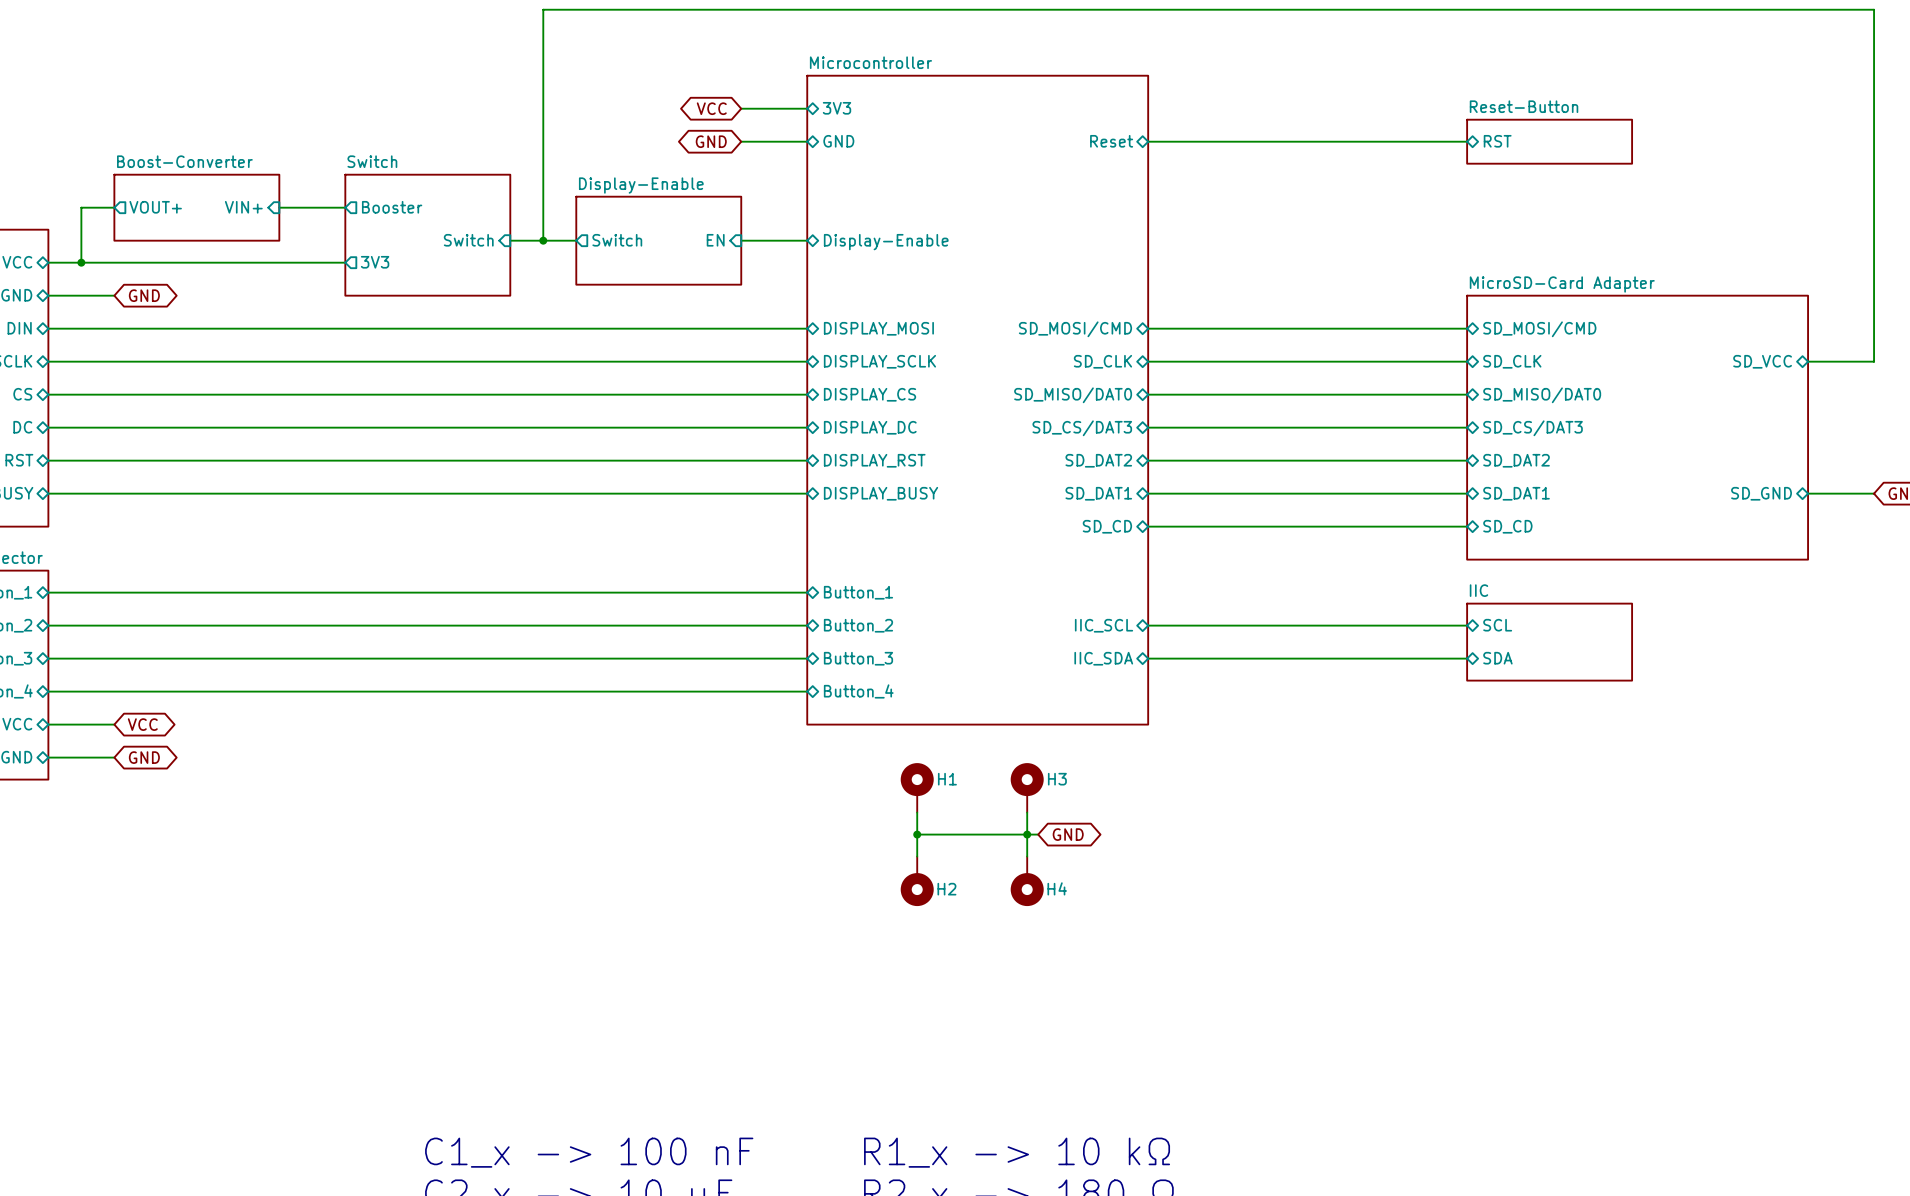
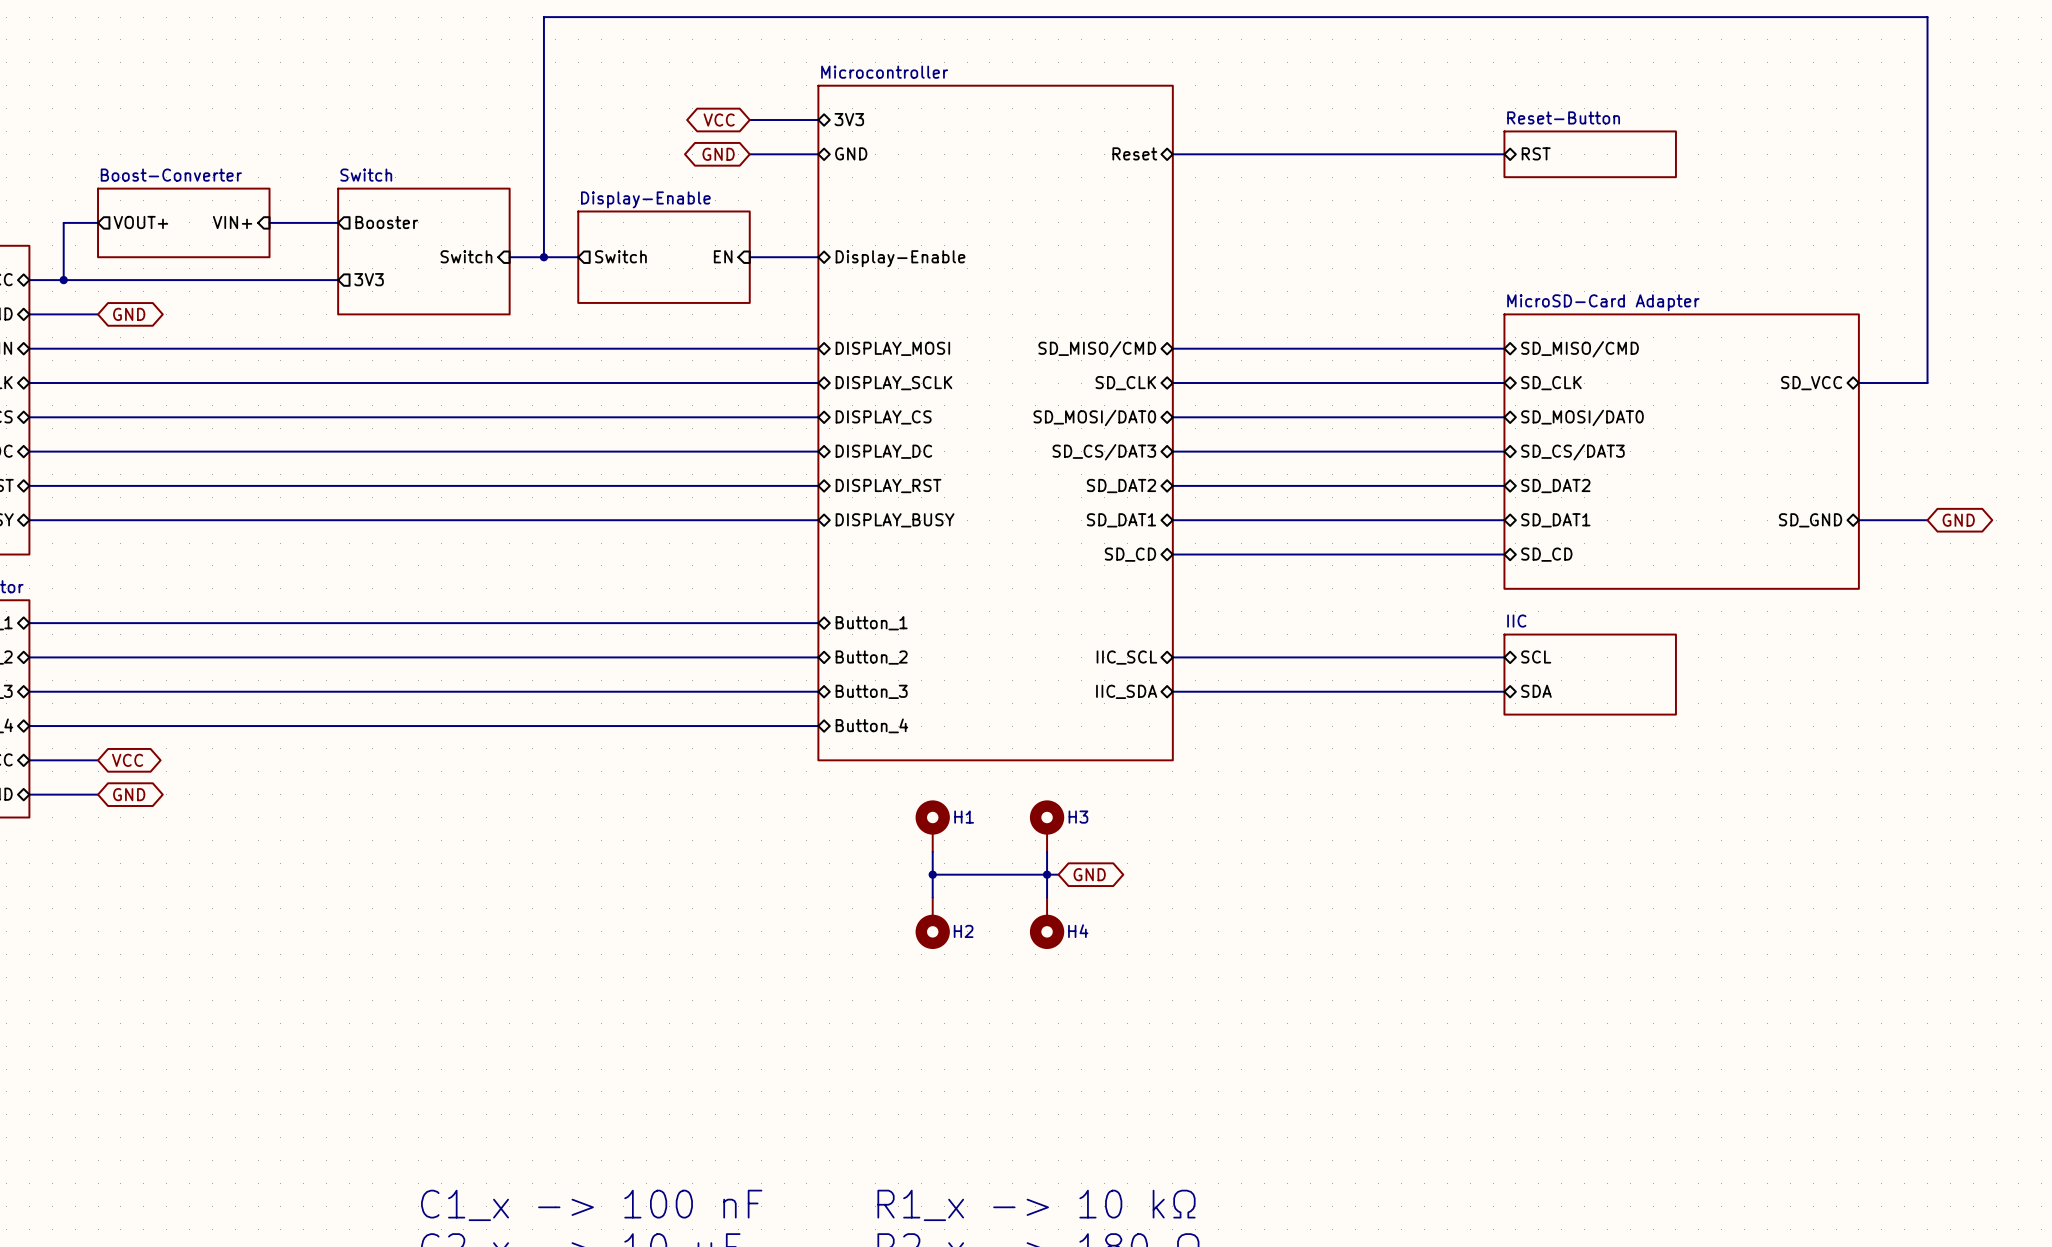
sheet pin: SD_MOSI/CMD (1075, 329) -> SD_MISO/CMD (1097, 349)
sheet pin: SD_MOSI/CMD (1539, 329) -> SD_MISO/CMD (1580, 349)
sheet pin: SD_MISO/DAT0 (1073, 395) -> SD_MOSI/DAT0 (1094, 417)
sheet pin: SD_MISO/DAT0 (1542, 395) -> SD_MOSI/DAT0 (1582, 417)

